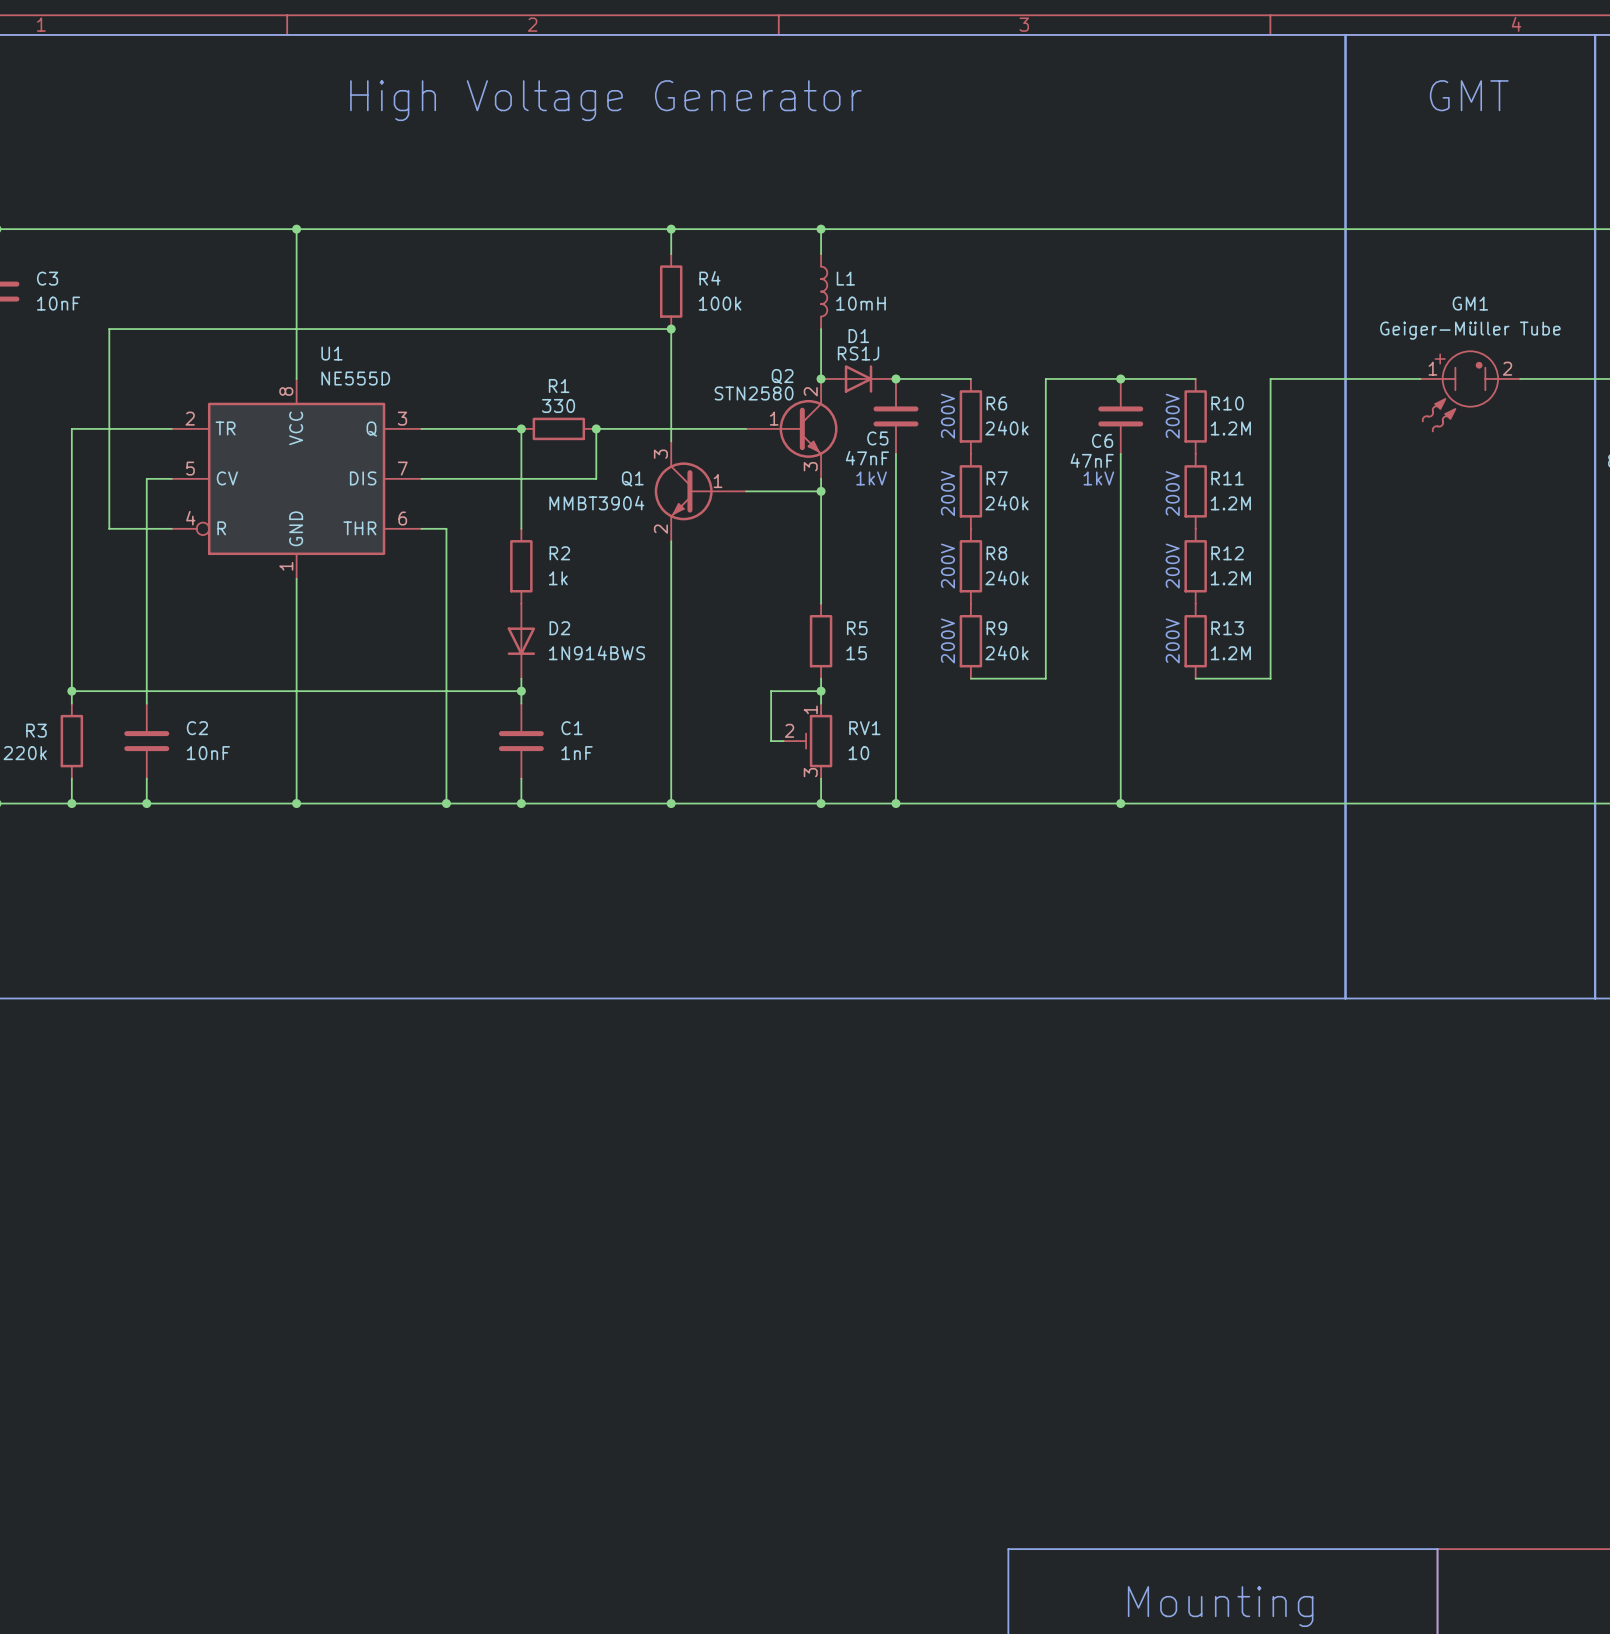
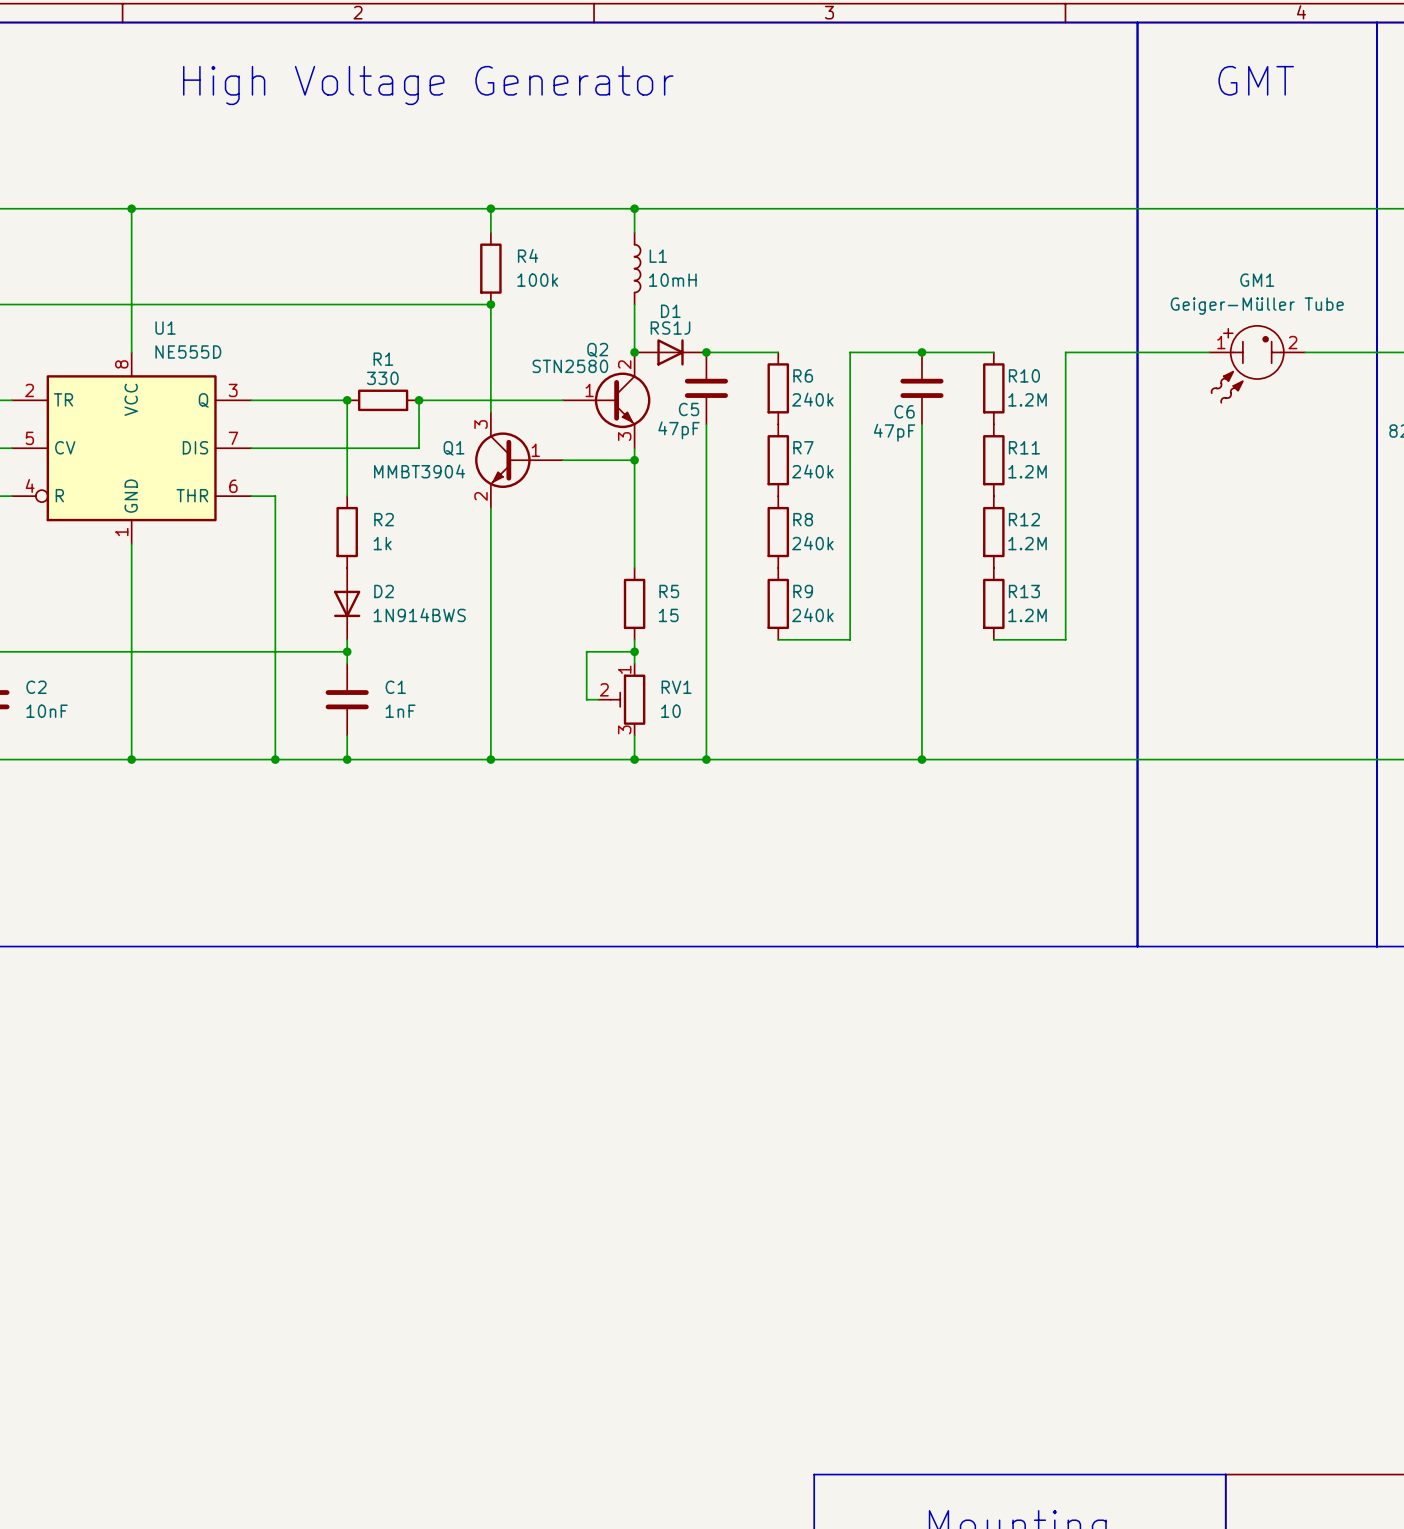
text: 200V (947, 416) -> none
text: 200V (1172, 416) -> none
C5 value: 47nF (867, 458) -> 47pF (679, 430)
C6 value: 47nF (1092, 460) -> 47pF (894, 432)
text: 1kV (871, 478) -> none
text: 1kV (1098, 478) -> none
text: 200V (947, 493) -> none
text: 200V (1172, 493) -> none
text: 200V (947, 566) -> none
text: 200V (1172, 566) -> none
text: 200V (947, 640) -> none
text: 200V (1172, 640) -> none

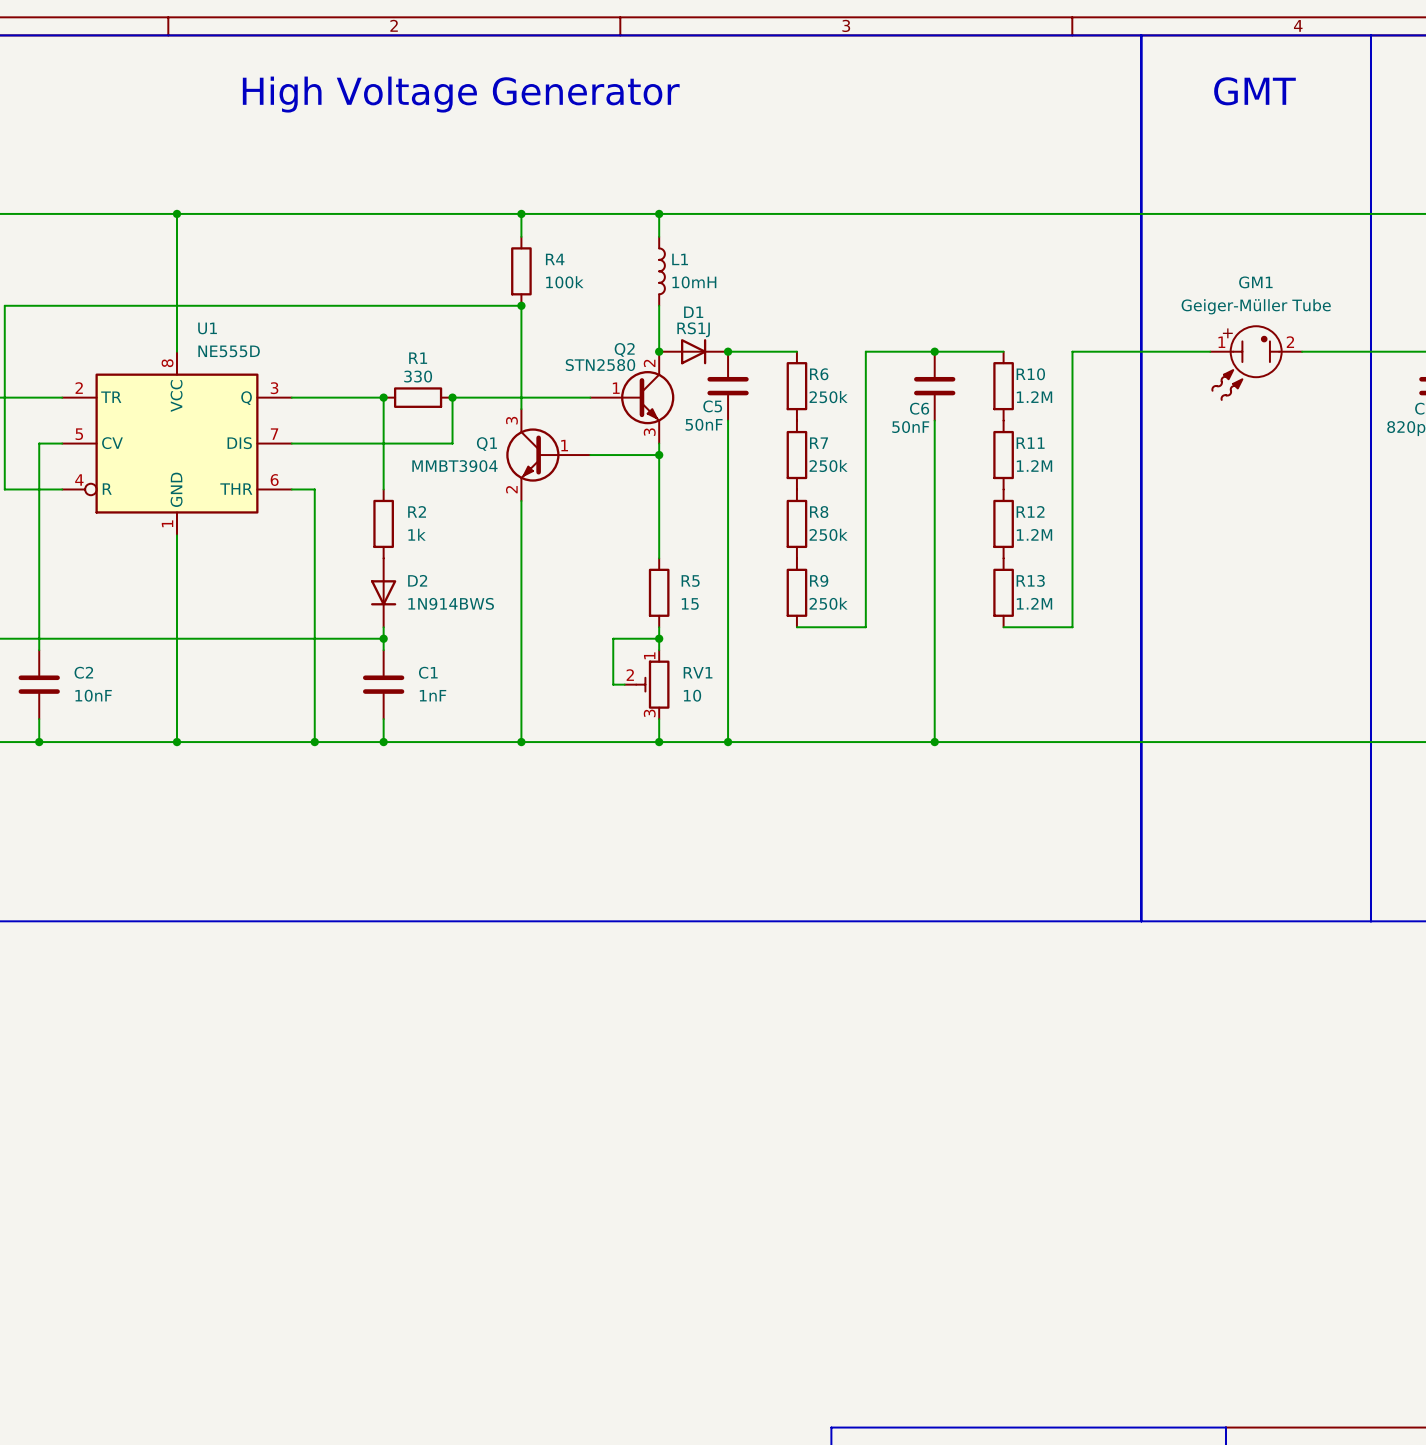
R6 value: 240k (812, 399) -> 250k (828, 397)
C5 value: 47pF (679, 430) -> 50nF (704, 424)
C6 value: 47pF (894, 432) -> 50nF (910, 427)
R7 value: 240k (812, 471) -> 250k (828, 465)
R8 value: 240k (812, 543) -> 250k (828, 534)
R9 value: 240k (812, 615) -> 250k (828, 603)

